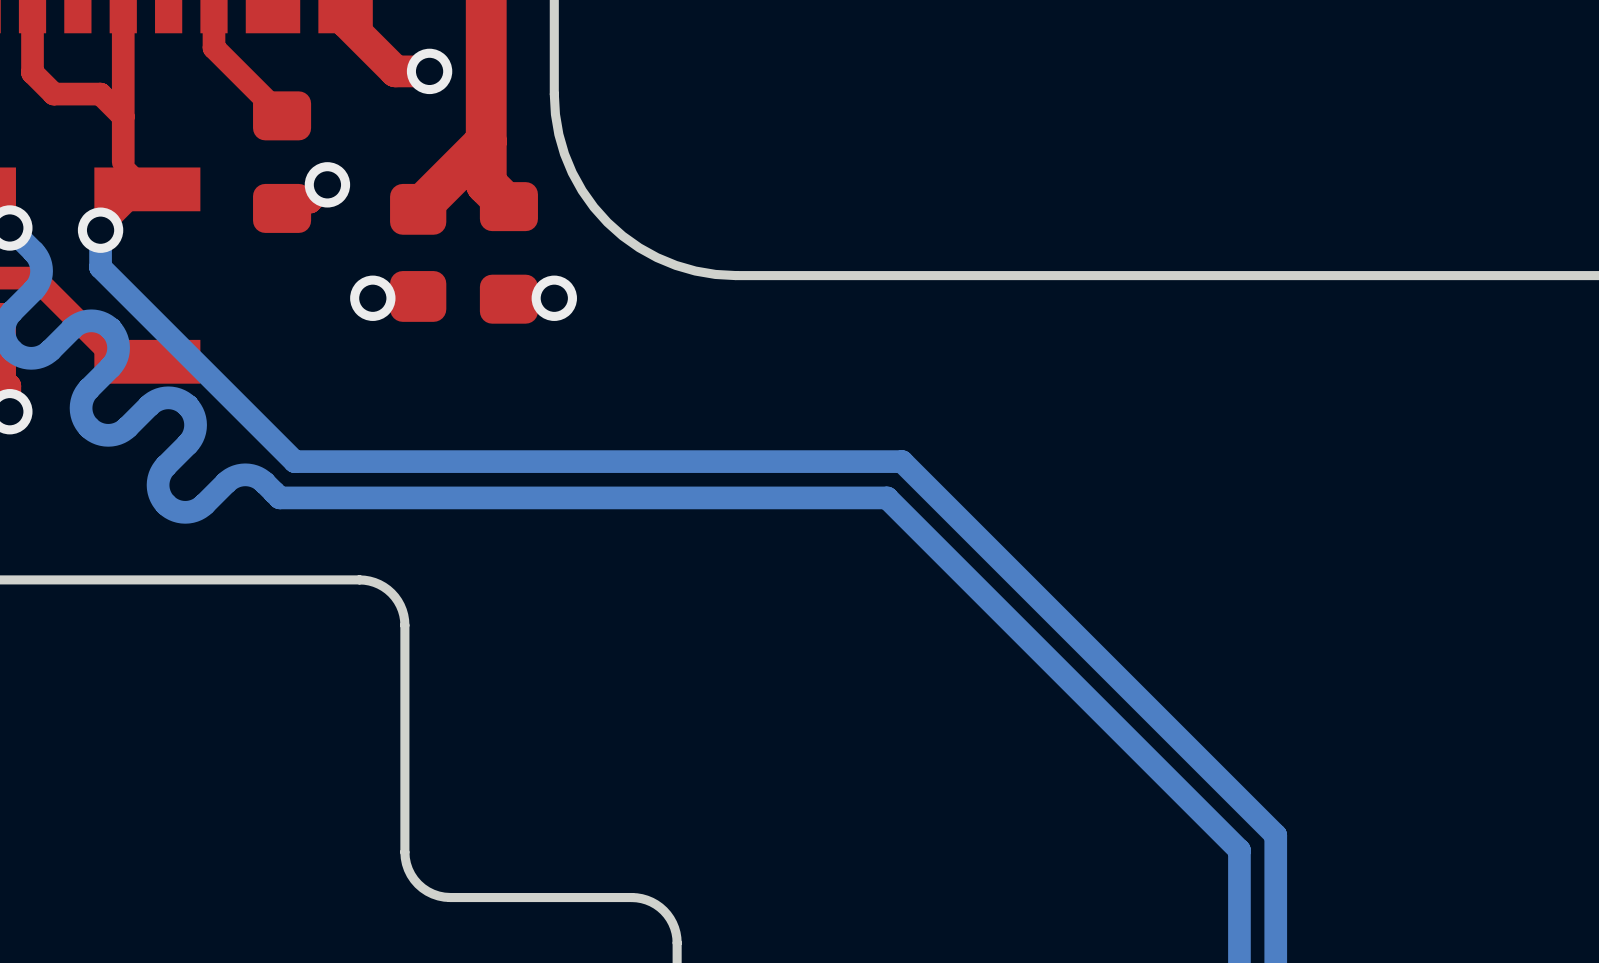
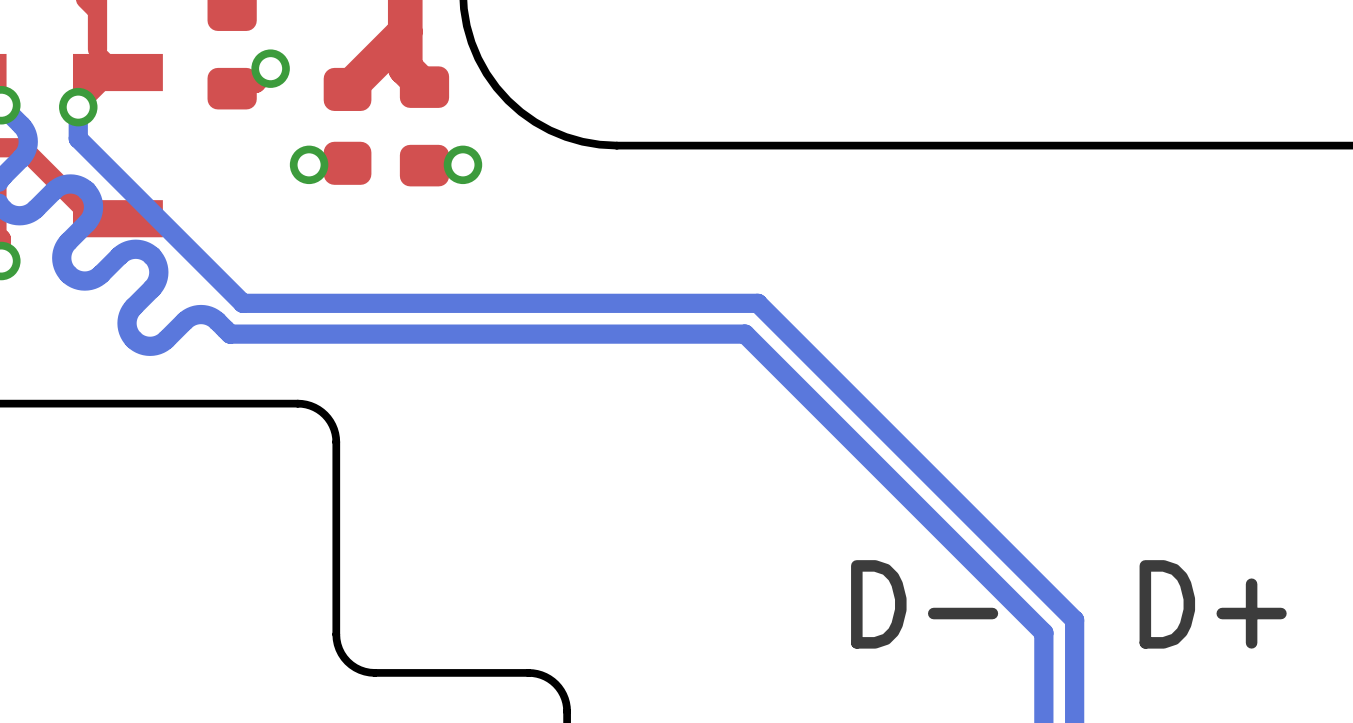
text: none -> D- (924, 604)
text: none -> D+ (1213, 604)

